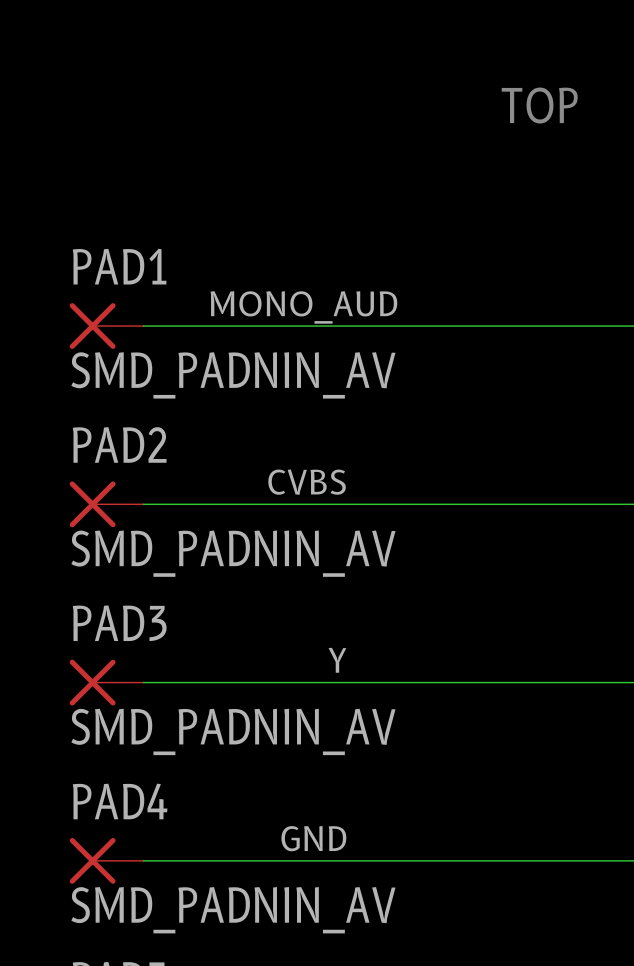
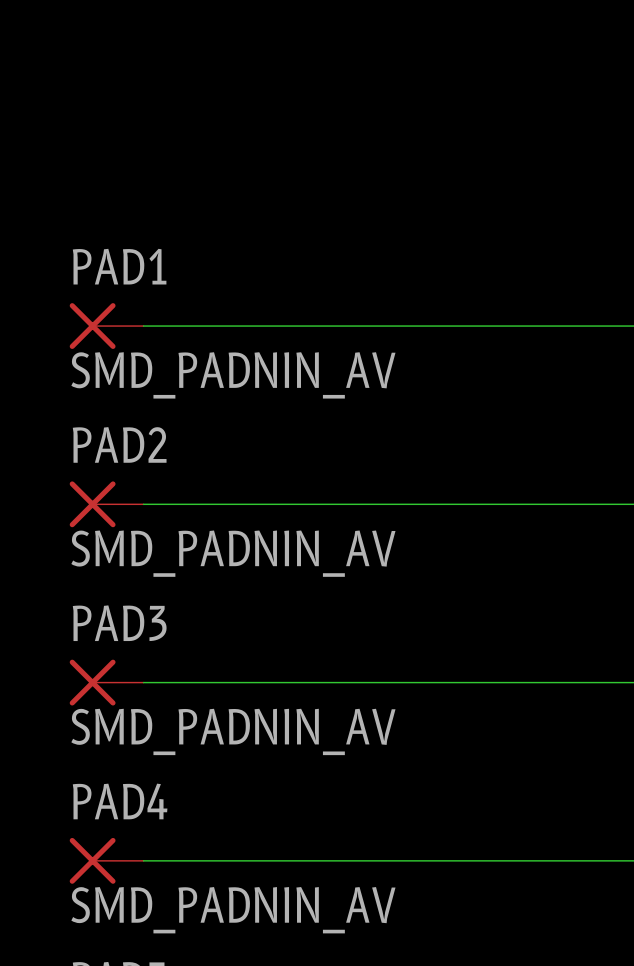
text: TOP (539, 105) -> none
label: MONO_AUD (303, 307) -> none
label: CVBS (307, 482) -> none
label: Y (337, 660) -> none
label: GND (313, 838) -> none

